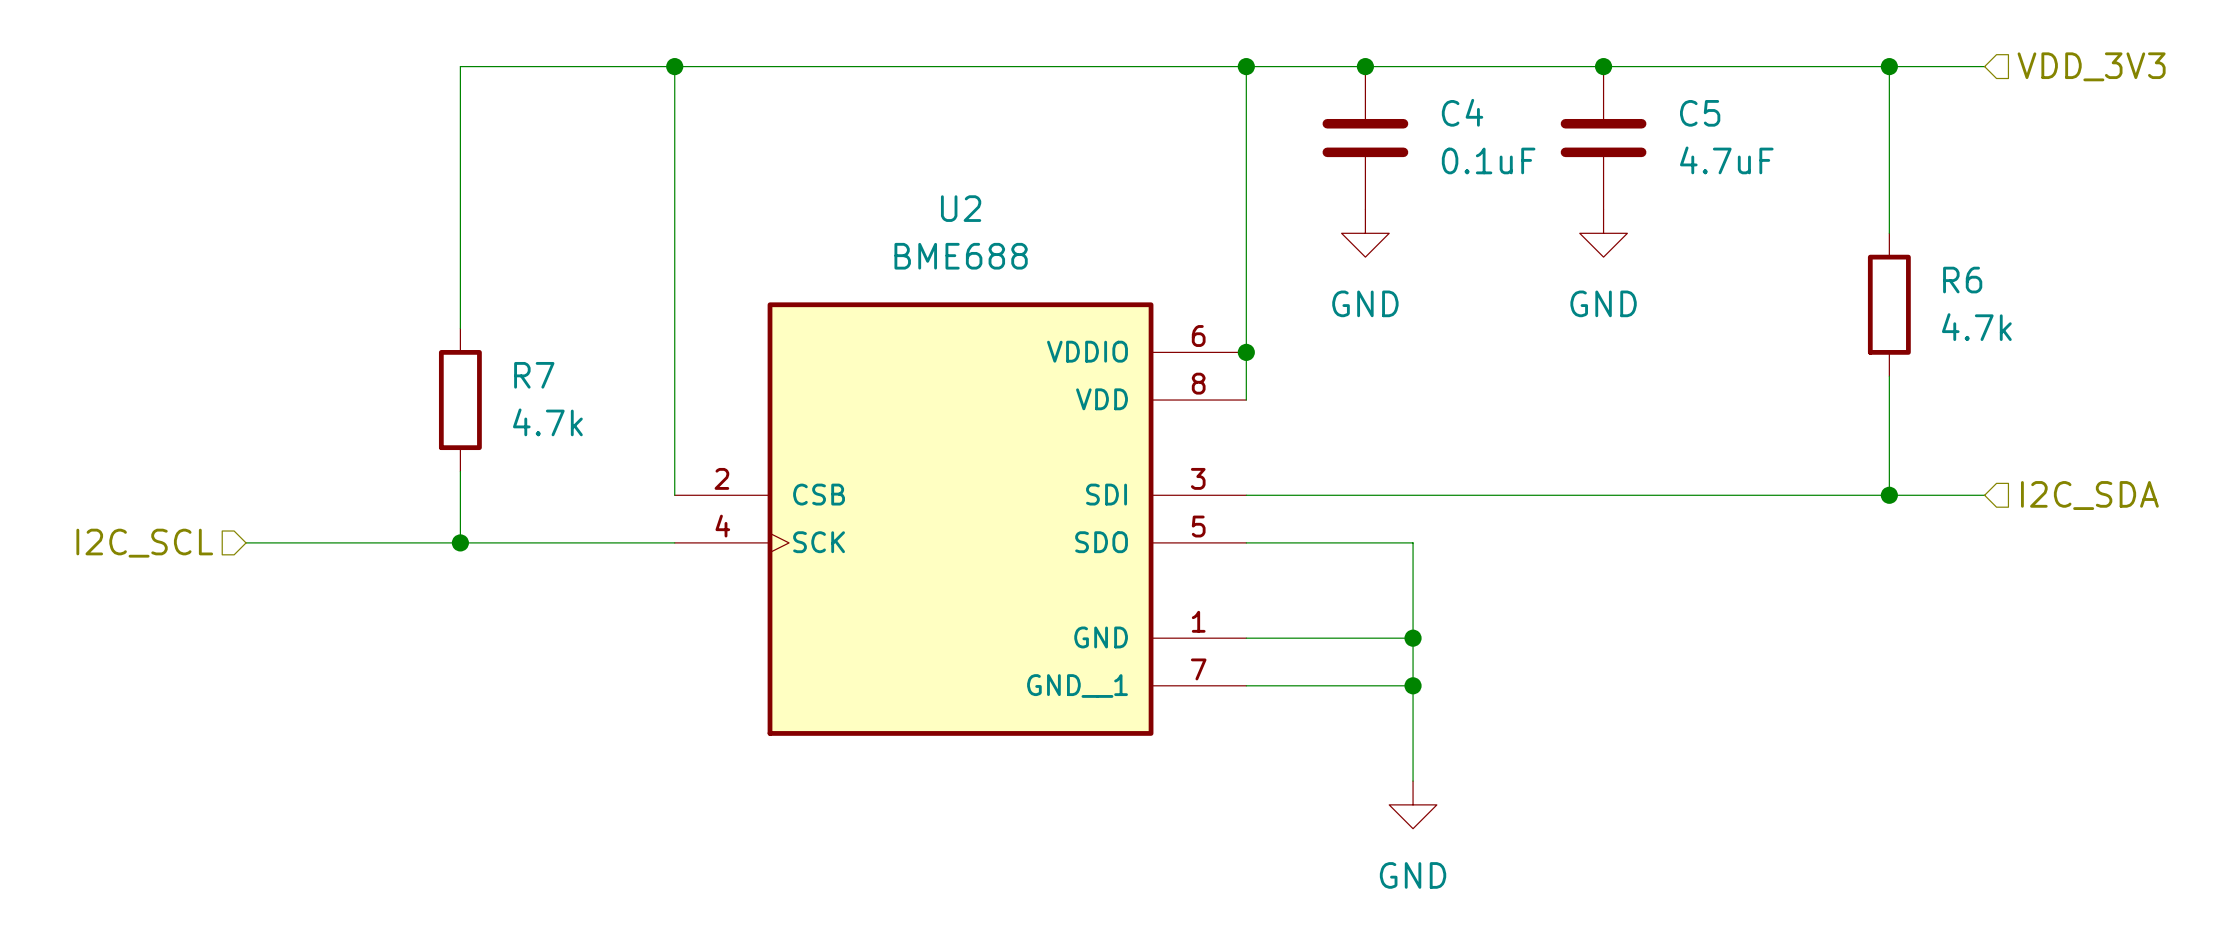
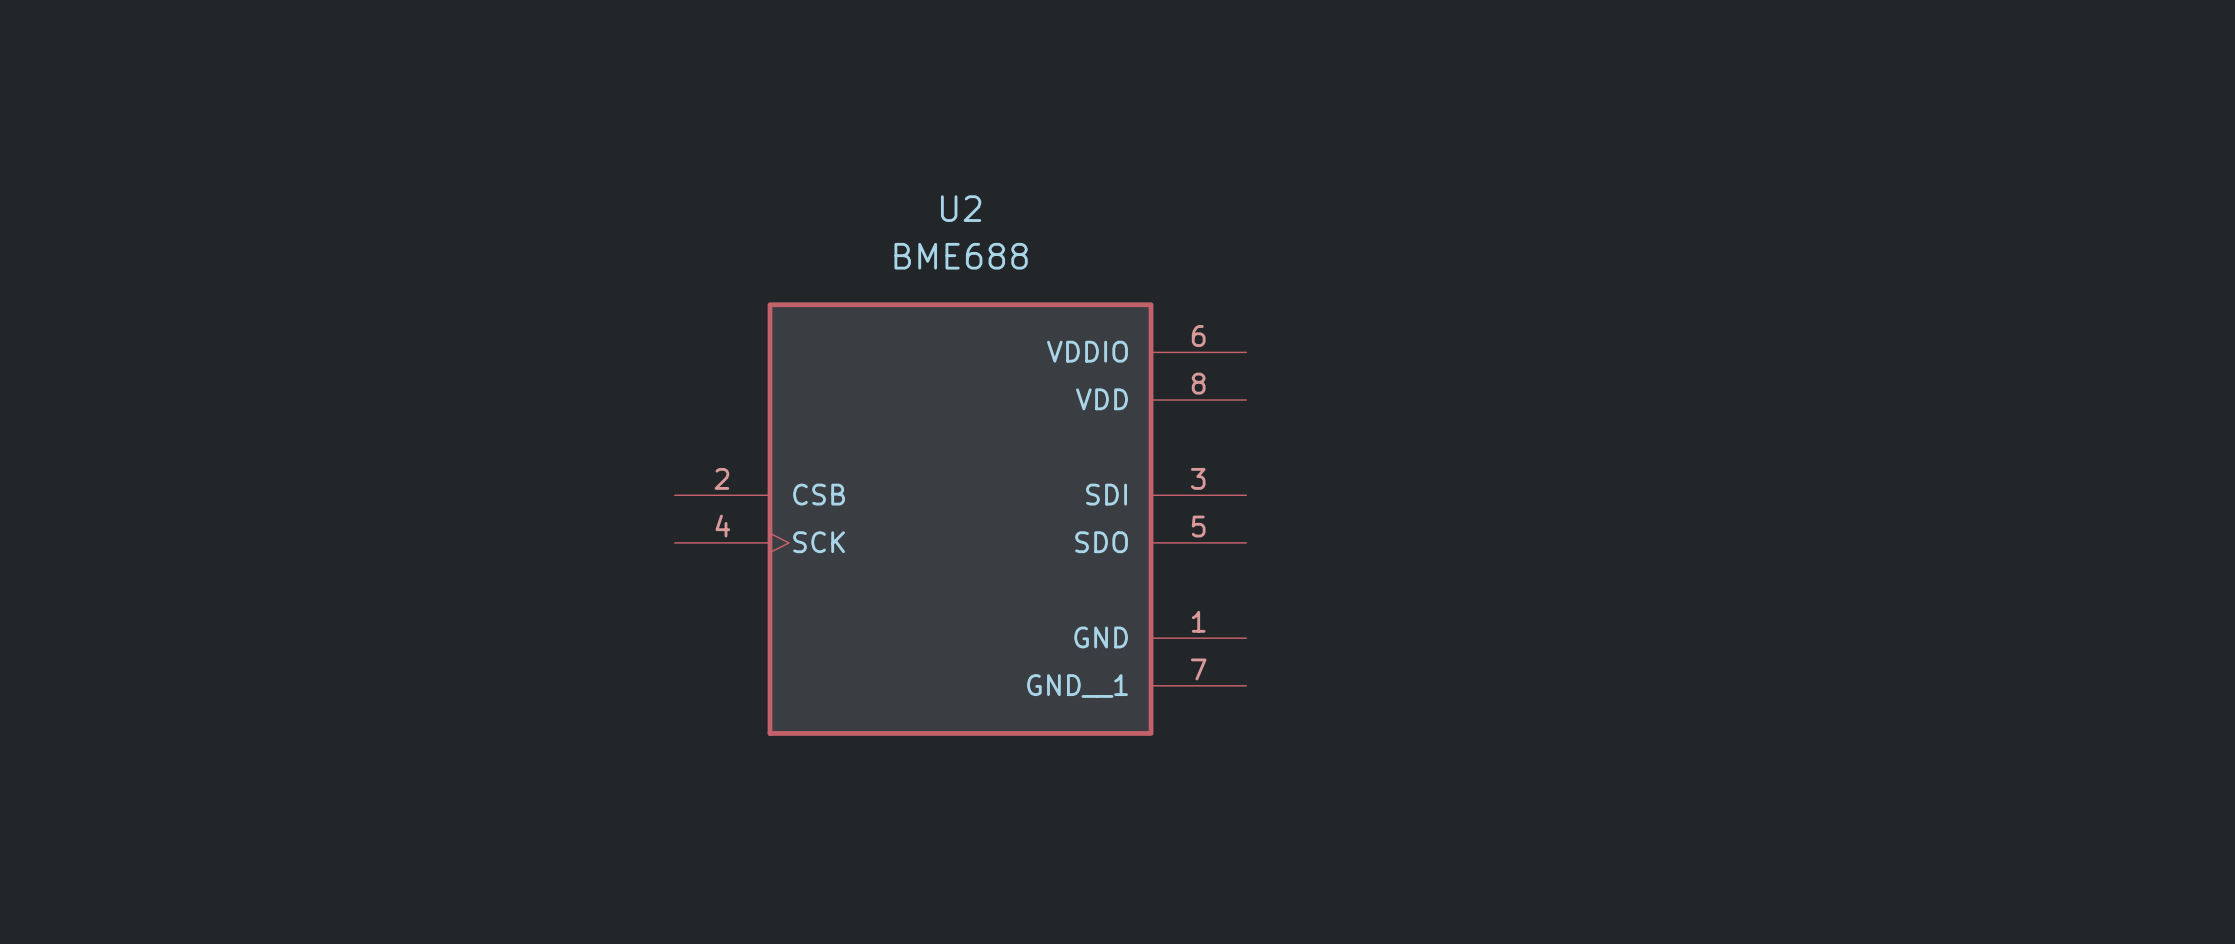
wire: (674, 66) (674, 495) -> none
junction: (674, 66) -> none
wire: (1246, 66) (1246, 400) -> none
junction: (1246, 66) -> none
junction: (1365, 66) -> none
junction: (1603, 66) -> none
wire: (1889, 66) (1889, 233) -> none
junction: (1889, 66) -> none
wire: (1984, 66) (460, 66) (460, 328) -> none
hierarchical label: VDD_3V3 (2091, 66) -> none
C4: 0.1uF (1365, 138) -> none
C5: 4.7uF (1603, 138) -> none
power symbol: GND (1365, 233) -> none
power symbol: GND (1603, 233) -> none
R6: 4.7k (1889, 304) -> none
junction: (1246, 352) -> none
wire: (1889, 376) (1889, 495) -> none
R7: 4.7k (460, 400) -> none
wire: (460, 471) (460, 542) -> none
wire: (1246, 495) (1984, 495) -> none
junction: (1889, 495) -> none
hierarchical label: I2C_SDA (2089, 495) -> none
wire: (246, 542) (674, 542) -> none
junction: (460, 542) -> none
wire: (1246, 542) (1413, 542) (1413, 781) -> none
hierarchical label: I2C_SCL (144, 543) -> none
wire: (1246, 638) (1413, 638) -> none
junction: (1413, 638) -> none
wire: (1246, 685) (1413, 685) -> none
junction: (1413, 685) -> none
power symbol: GND (1413, 804) -> none

